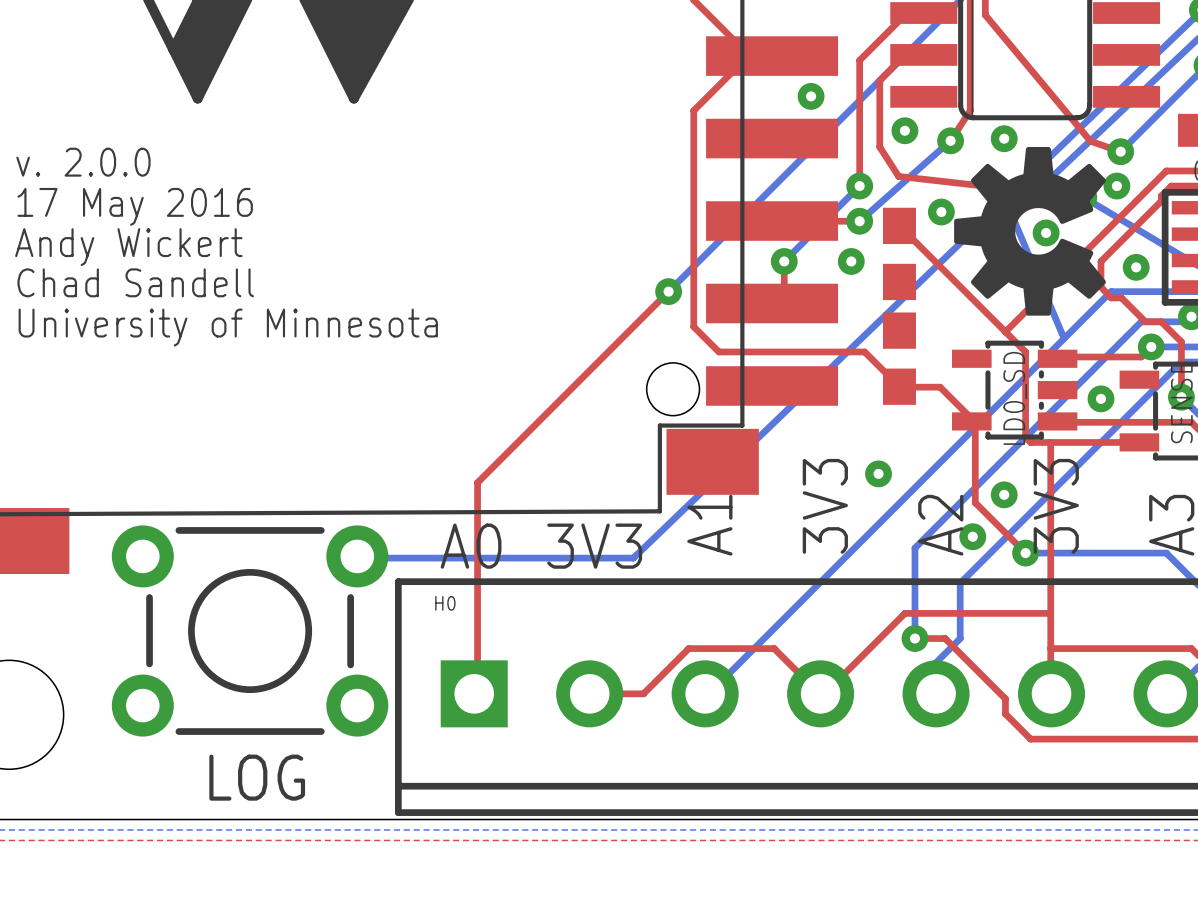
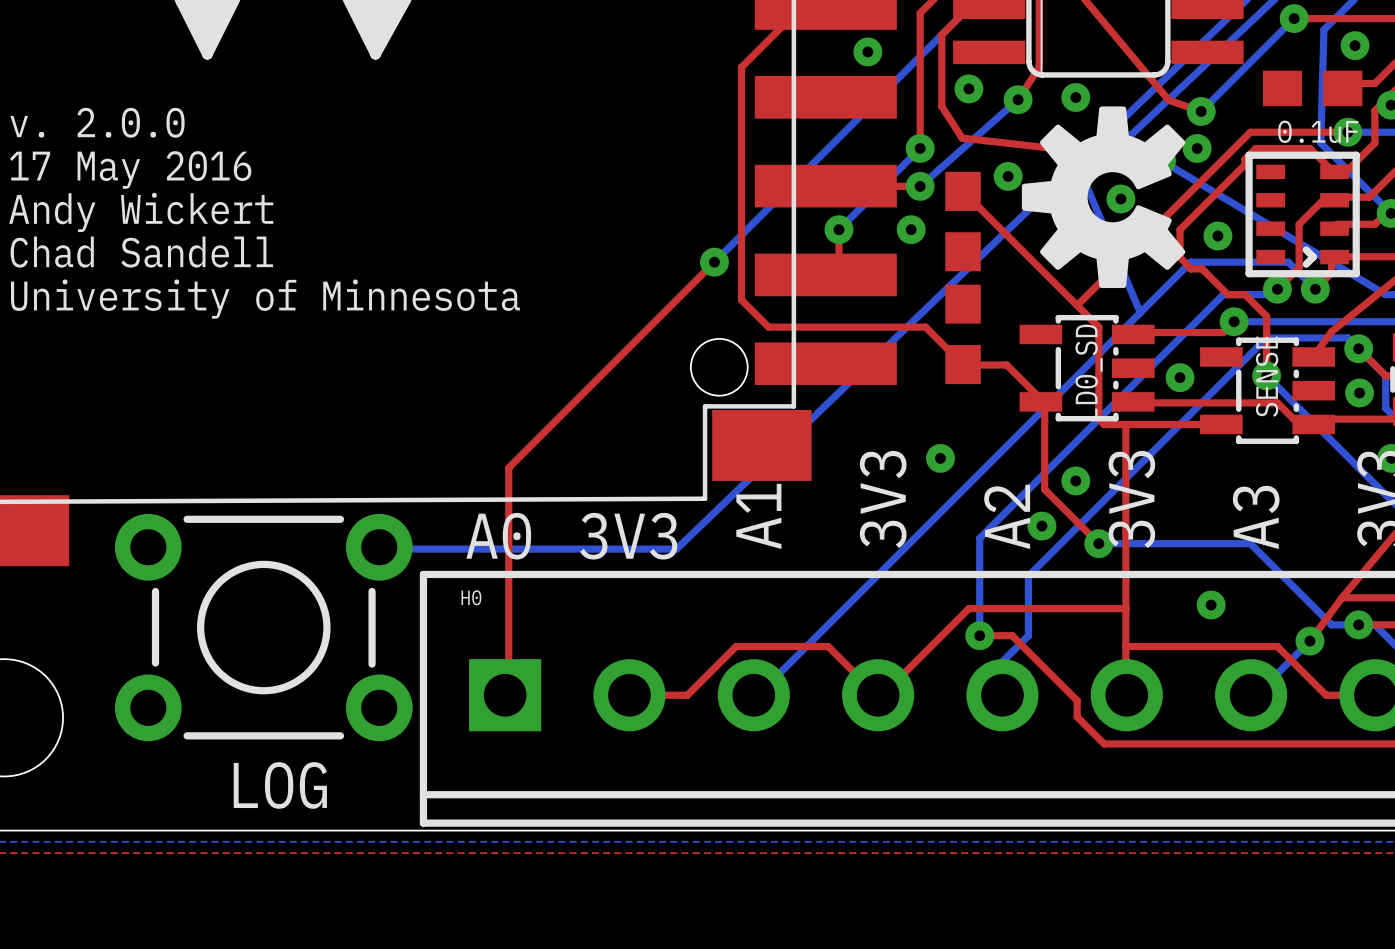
via: none -> (1211, 605)

